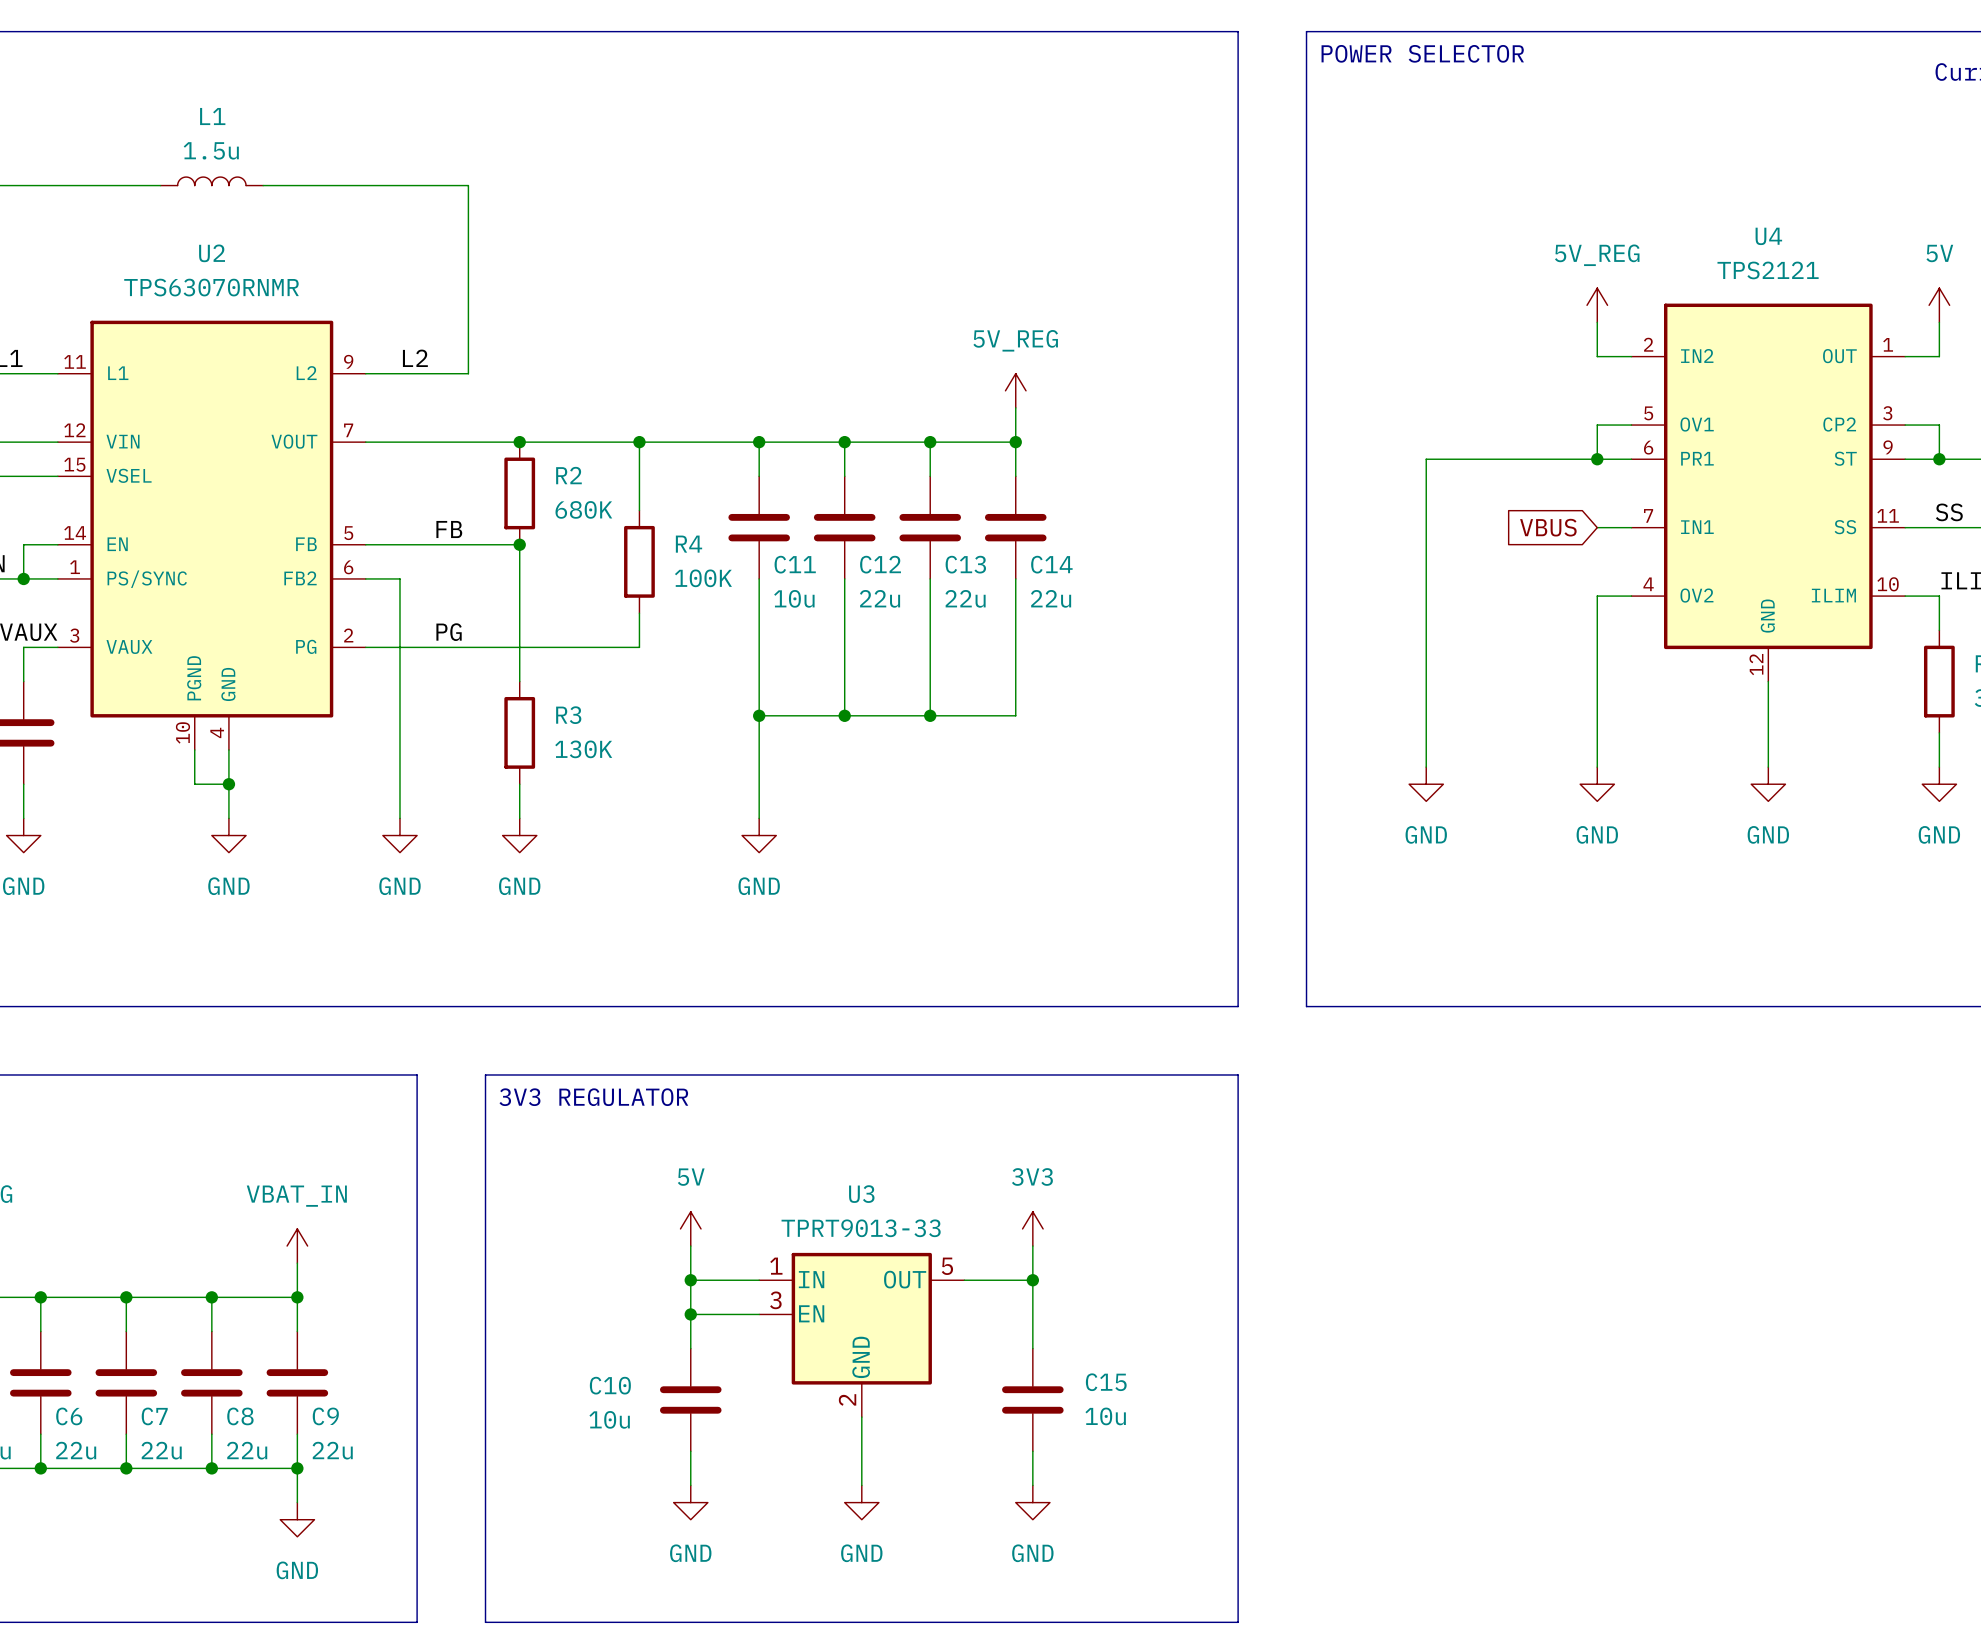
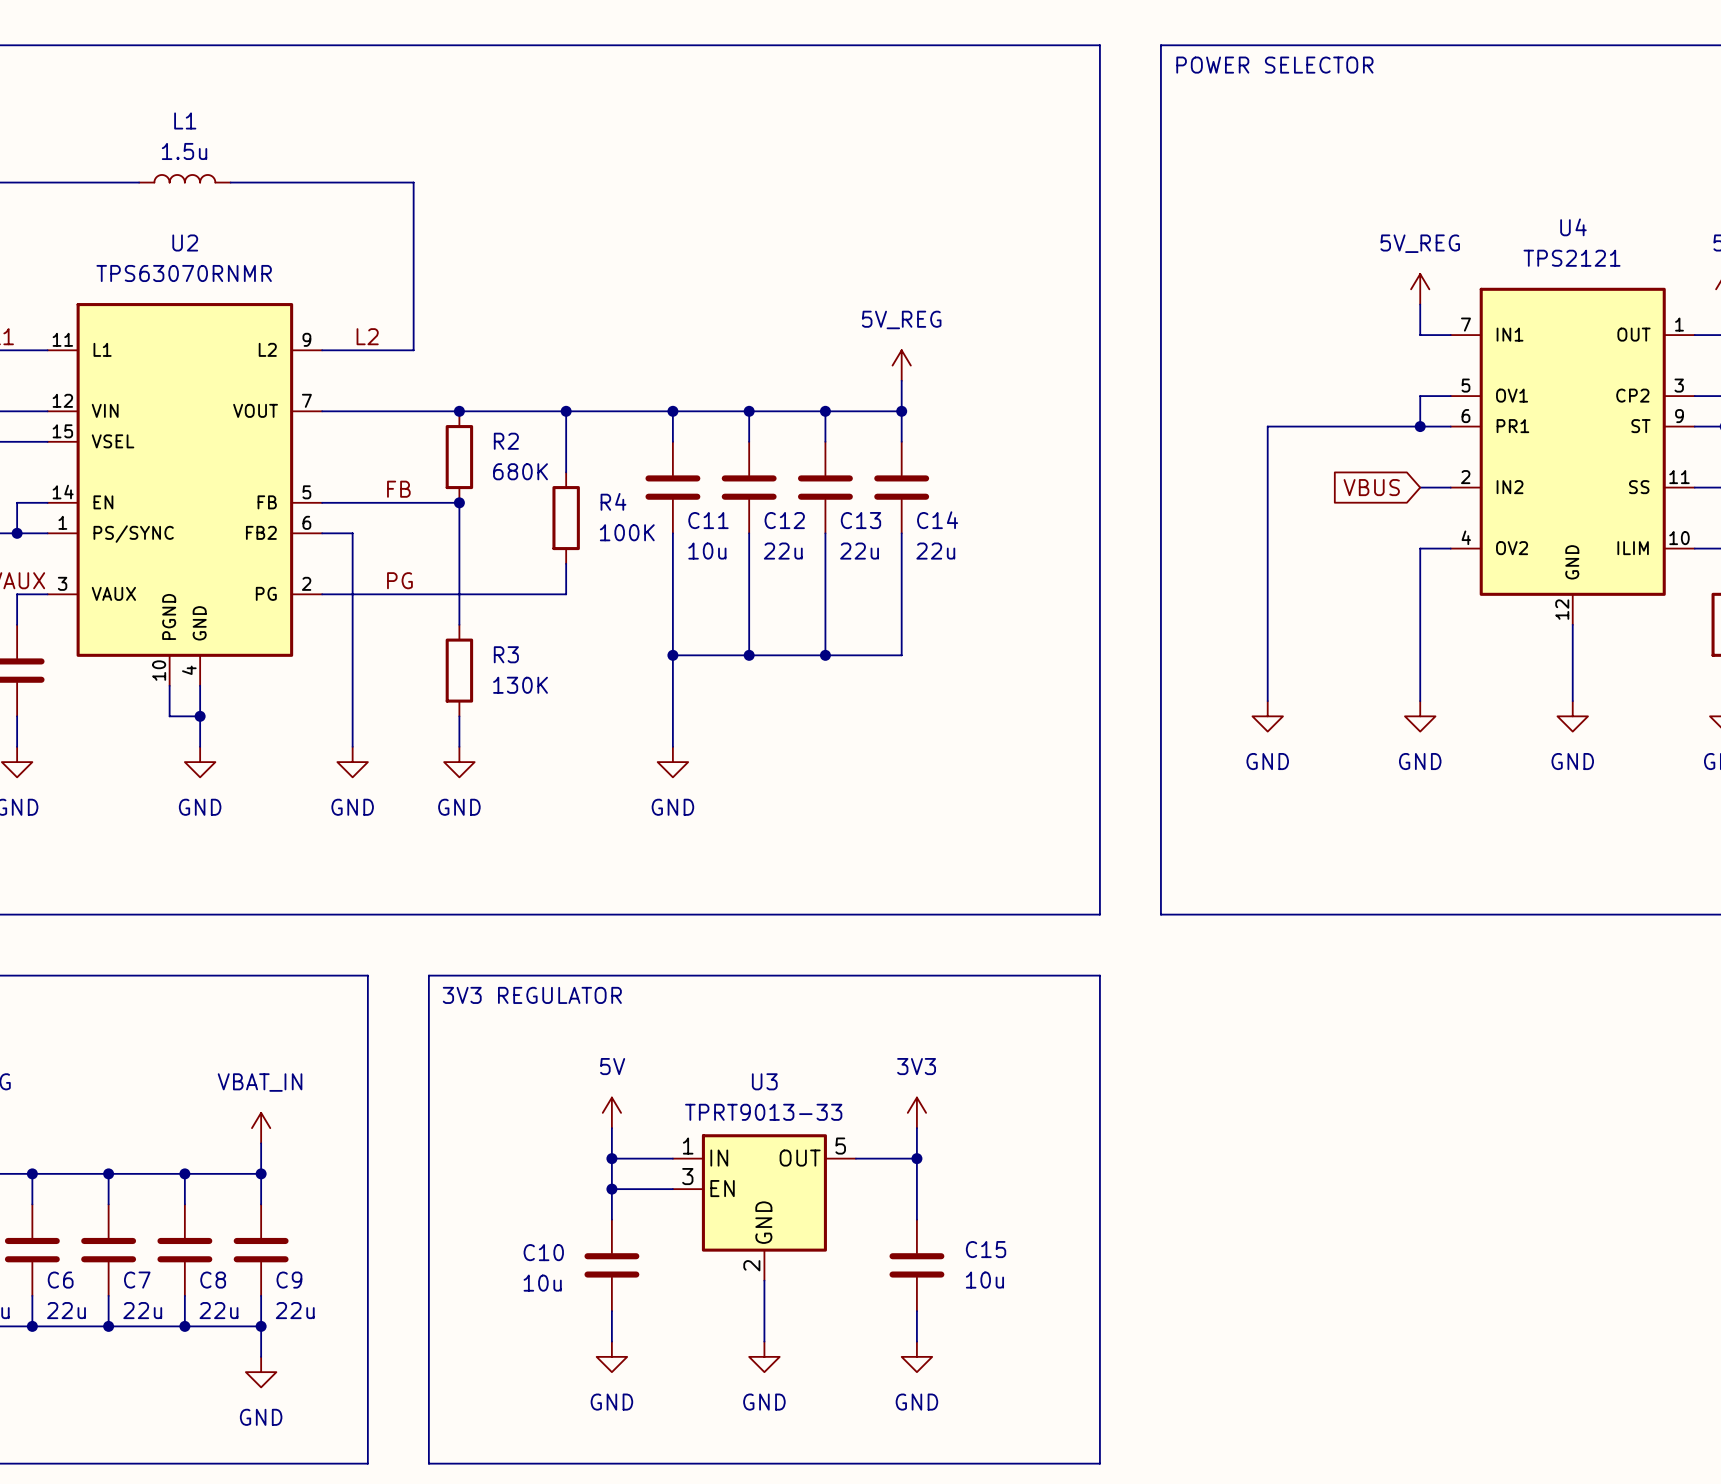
U4 pin number: 2 (1648, 344) -> 7 (1465, 324)
U4 pin name: IN2 (1697, 355) -> IN1 (1510, 334)
U4 pin number: 7 (1648, 515) -> 2 (1465, 477)
U4 pin name: IN1 (1697, 527) -> IN2 (1510, 487)

